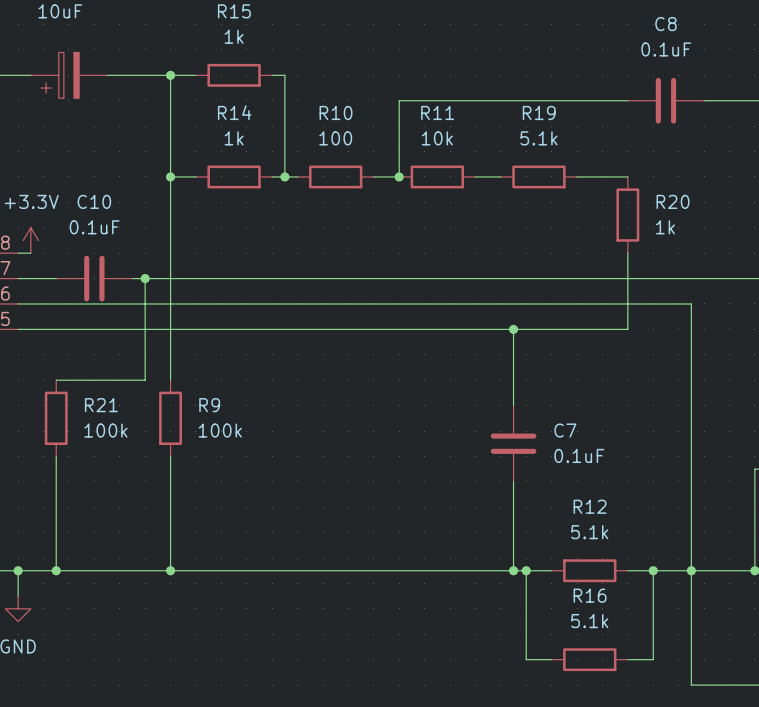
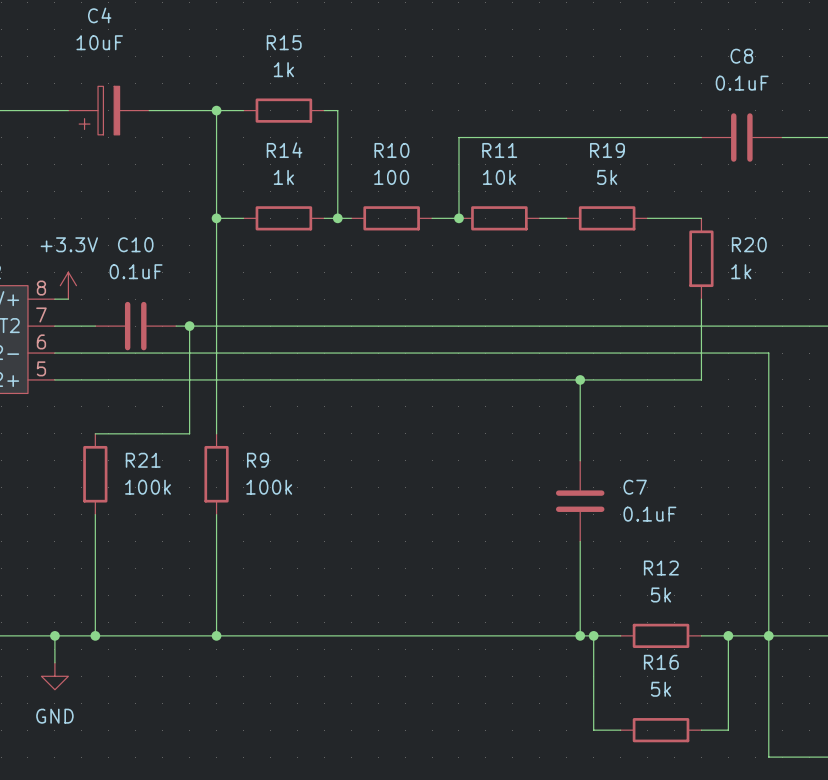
R19 value: 5.1k (538, 138) -> 5k (607, 177)
R12 value: 5.1k (589, 532) -> 5k (661, 594)
R16 value: 5.1k (589, 621) -> 5k (661, 689)

